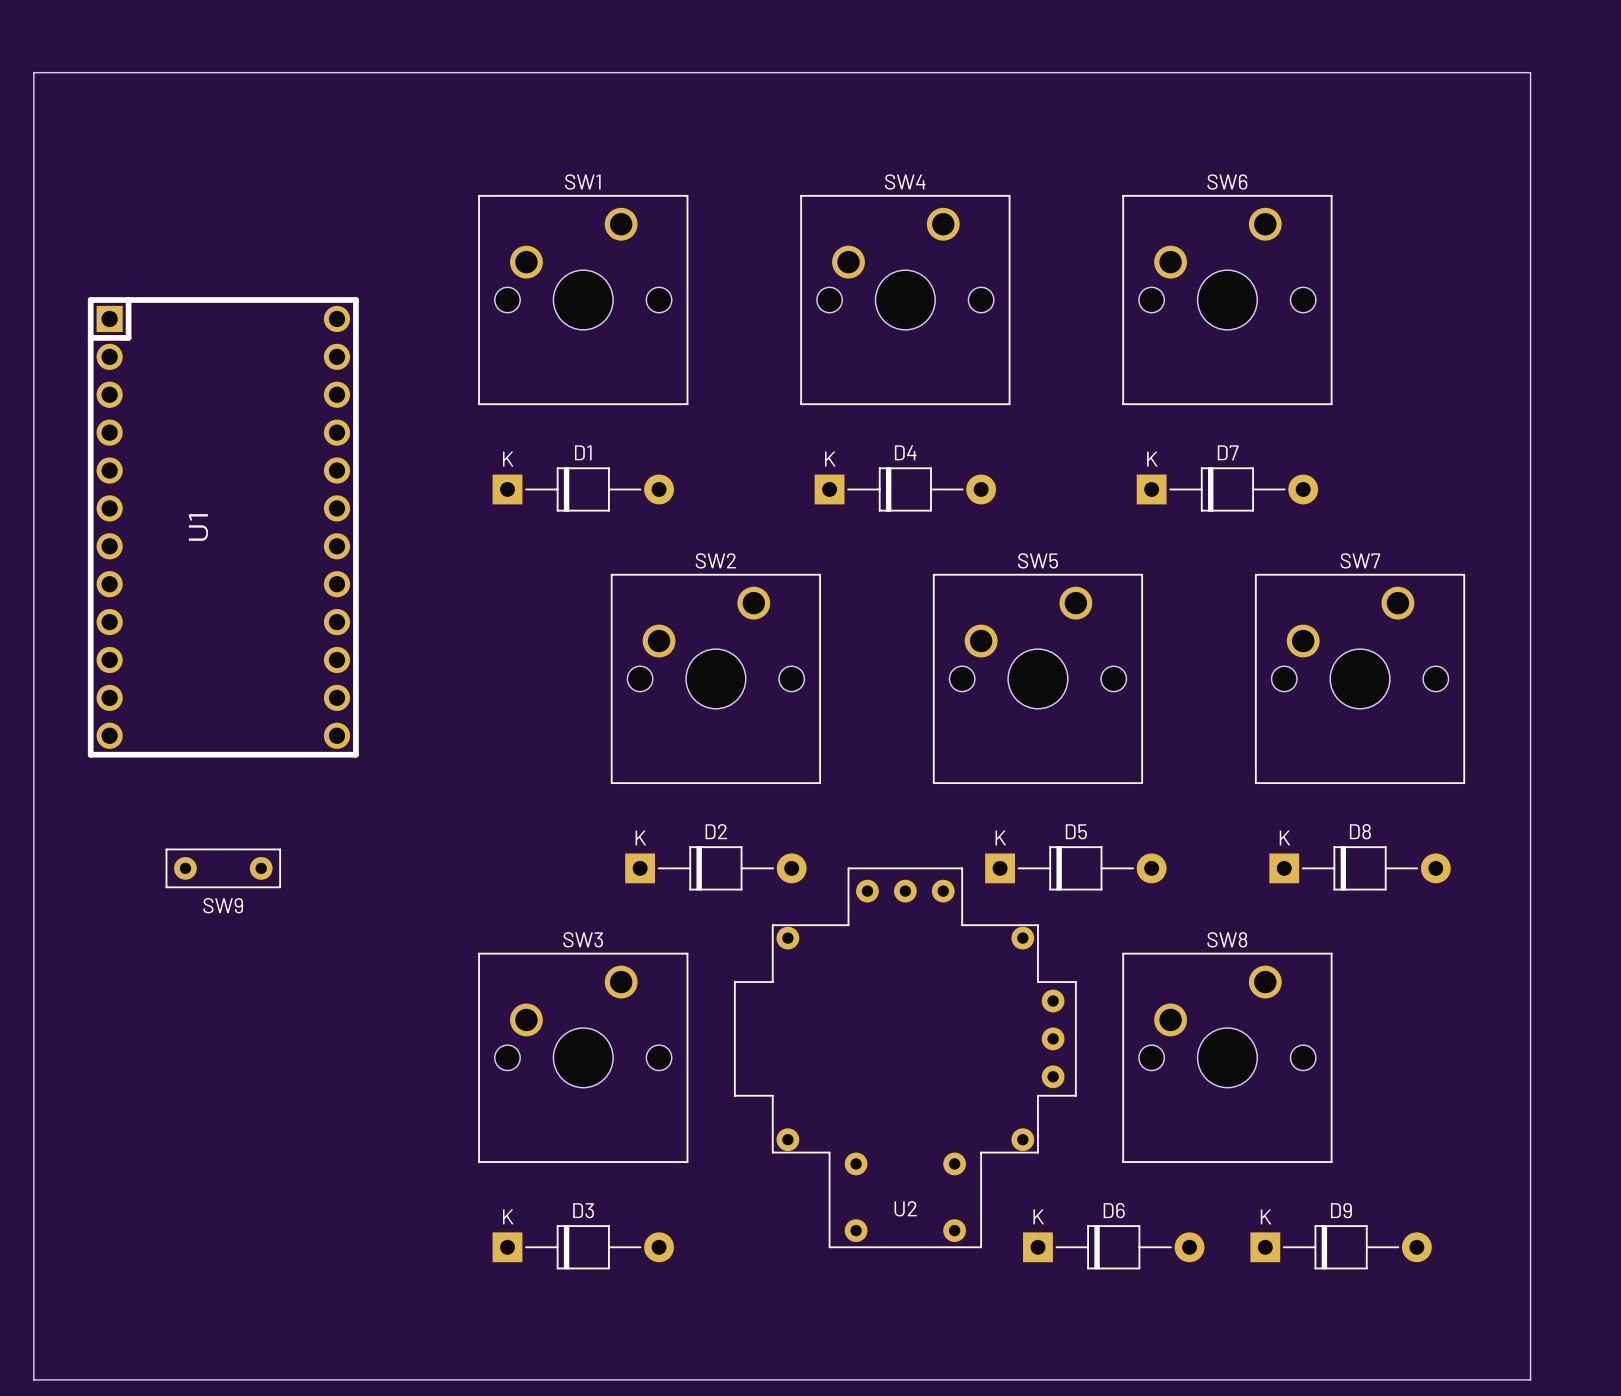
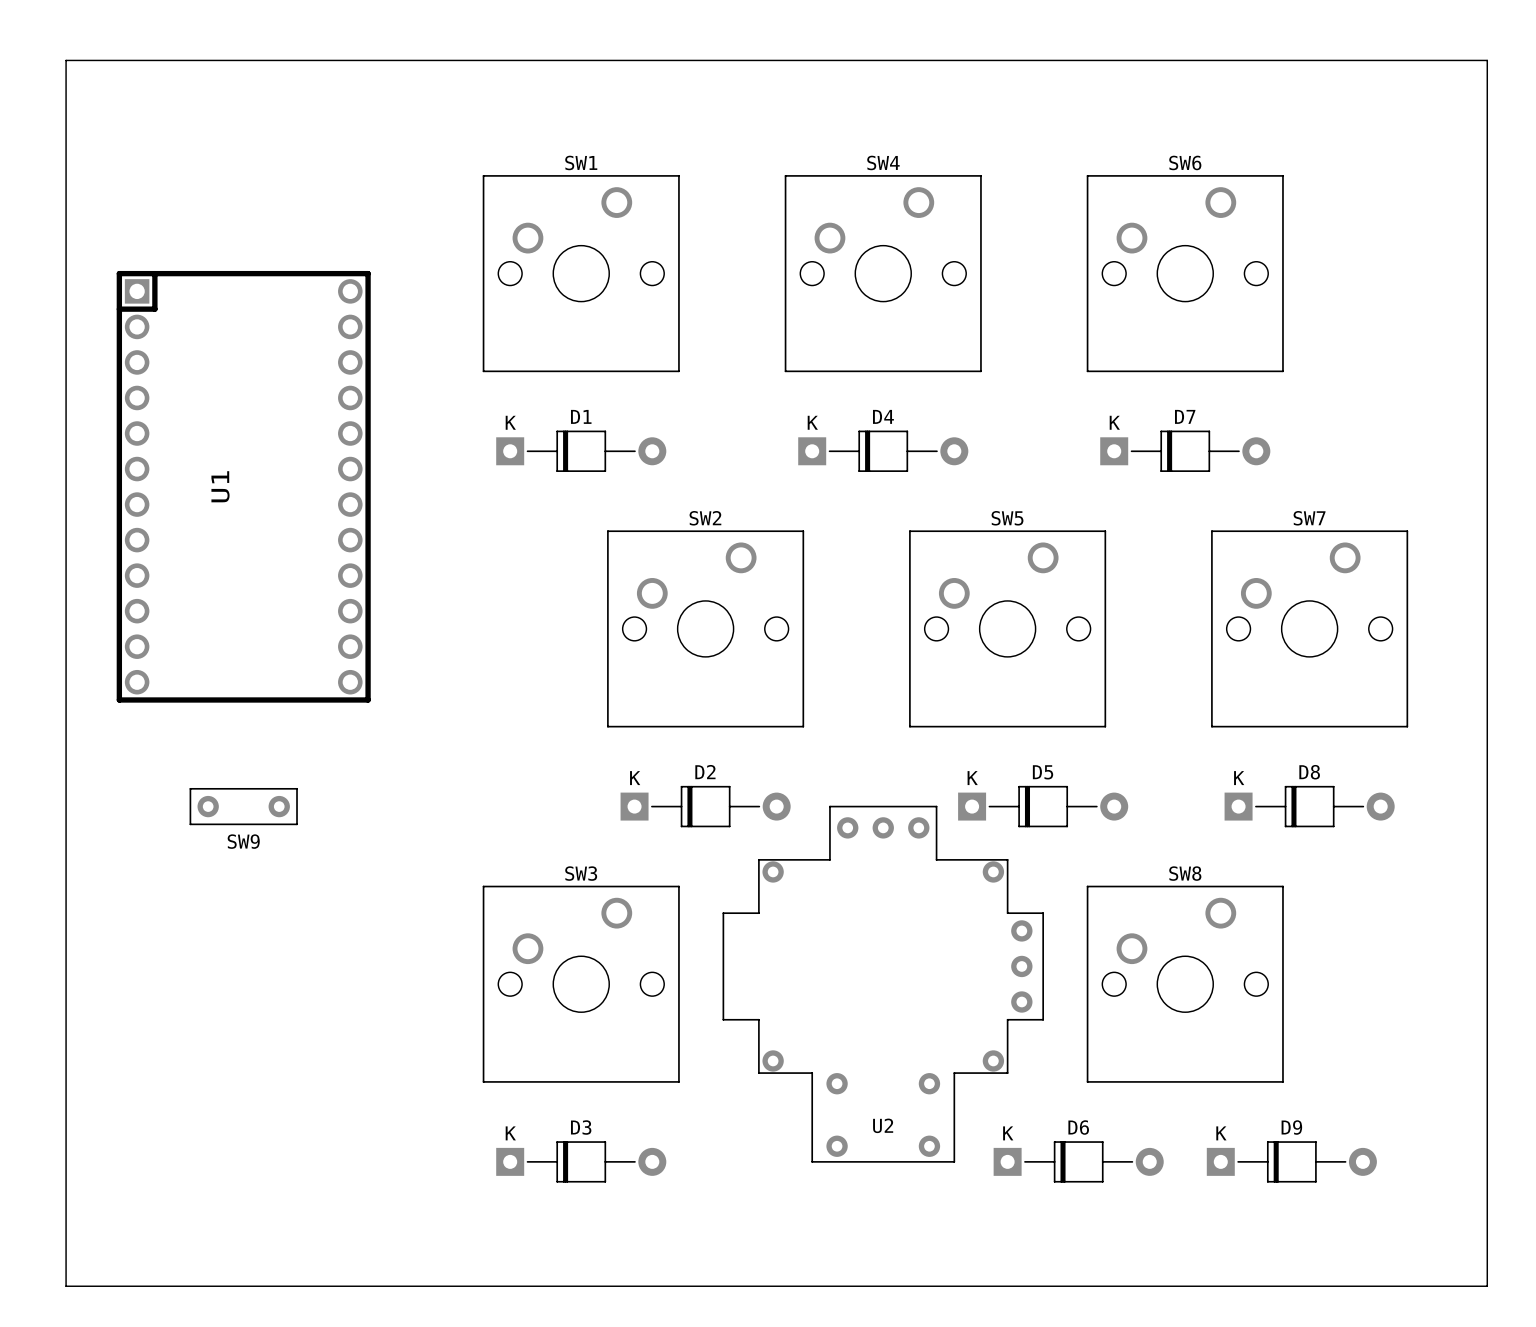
board edge: (1530, 72) (1530, 1379) -> (1469, 60) (1487, 60) (1487, 1286) (1469, 1286)

